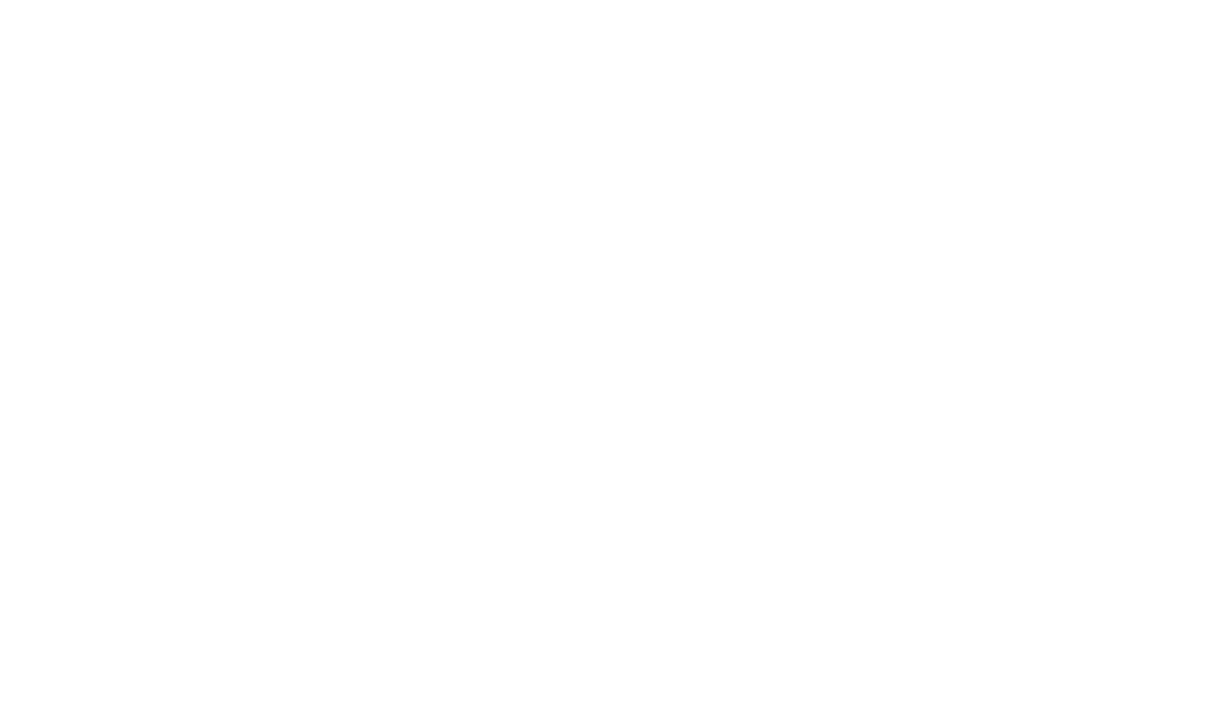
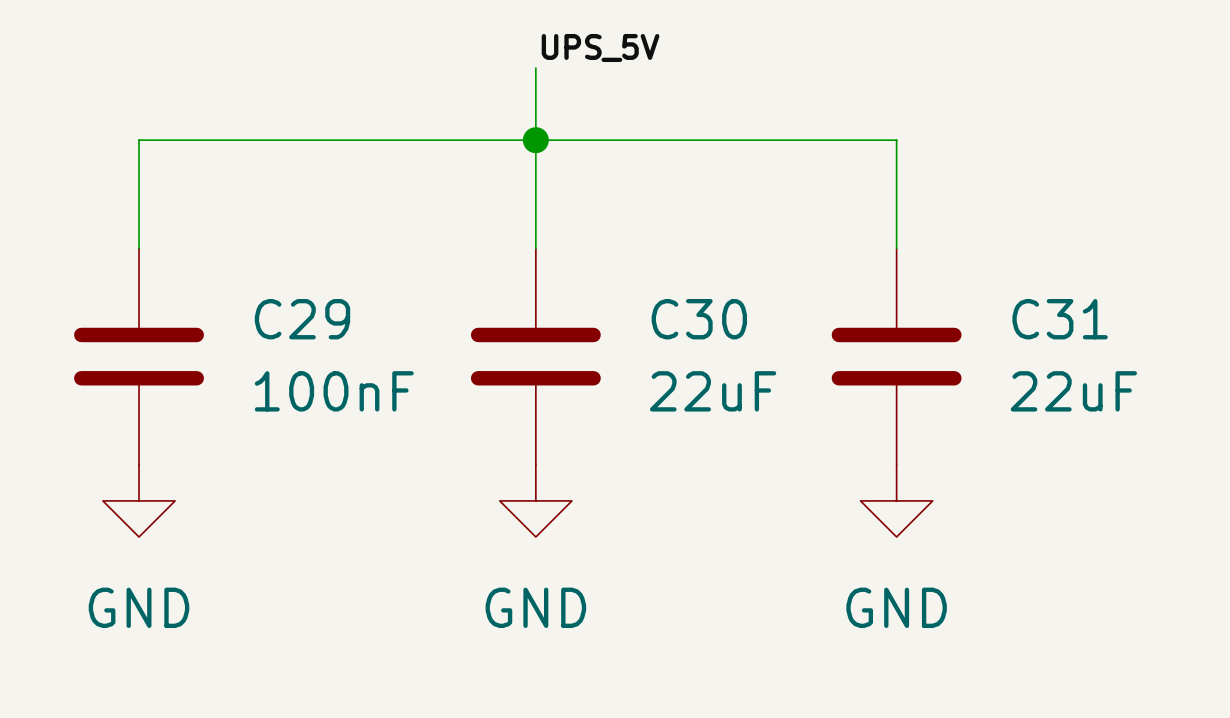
label: none -> UPS_5V (600, 48)
wire: none -> (535, 68) (535, 248)
junction: none -> (535, 140)
wire: none -> (139, 248) (139, 140) (896, 140) (896, 248)
C29: none -> 100nF (139, 356)
C30: none -> 22uF (535, 356)
C31: none -> 22uF (896, 356)
power symbol: none -> GND (139, 500)
power symbol: none -> GND (535, 500)
power symbol: none -> GND (896, 500)

